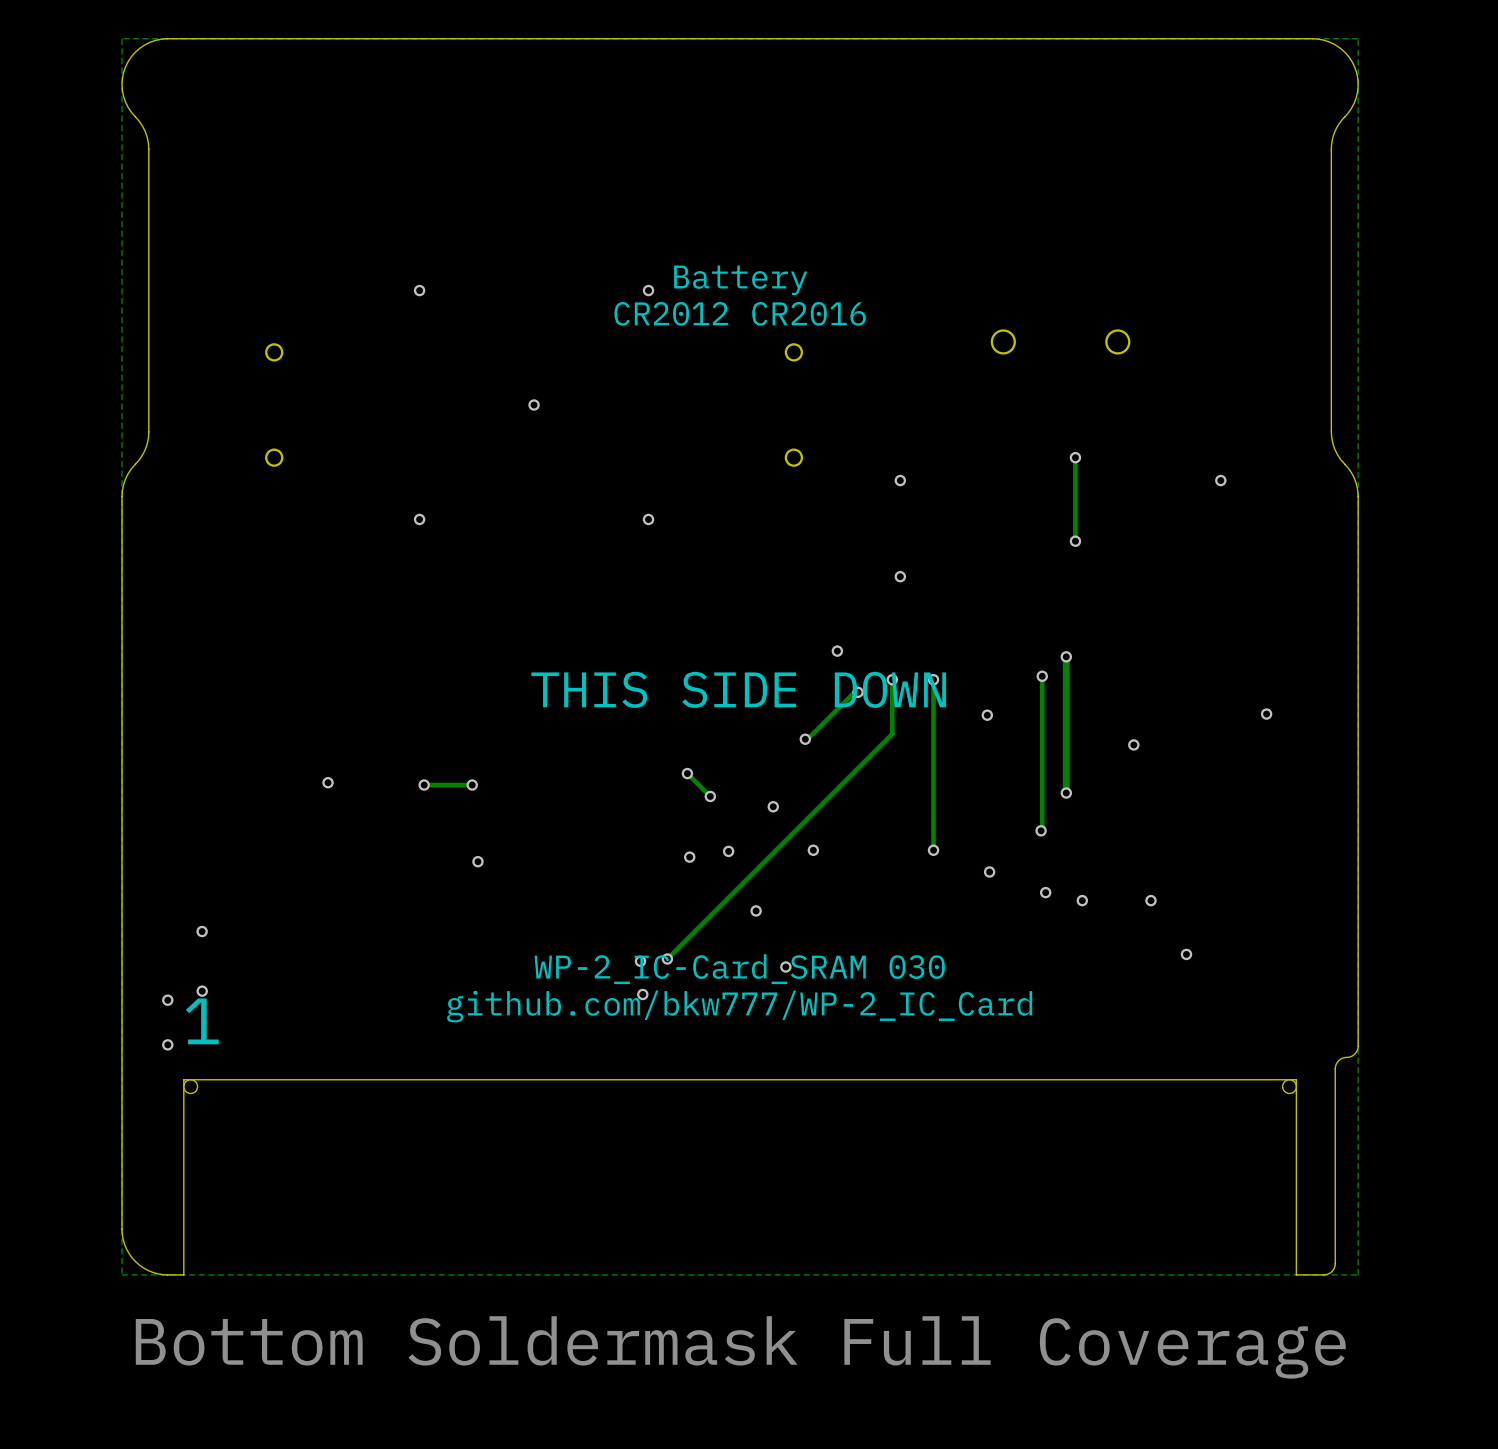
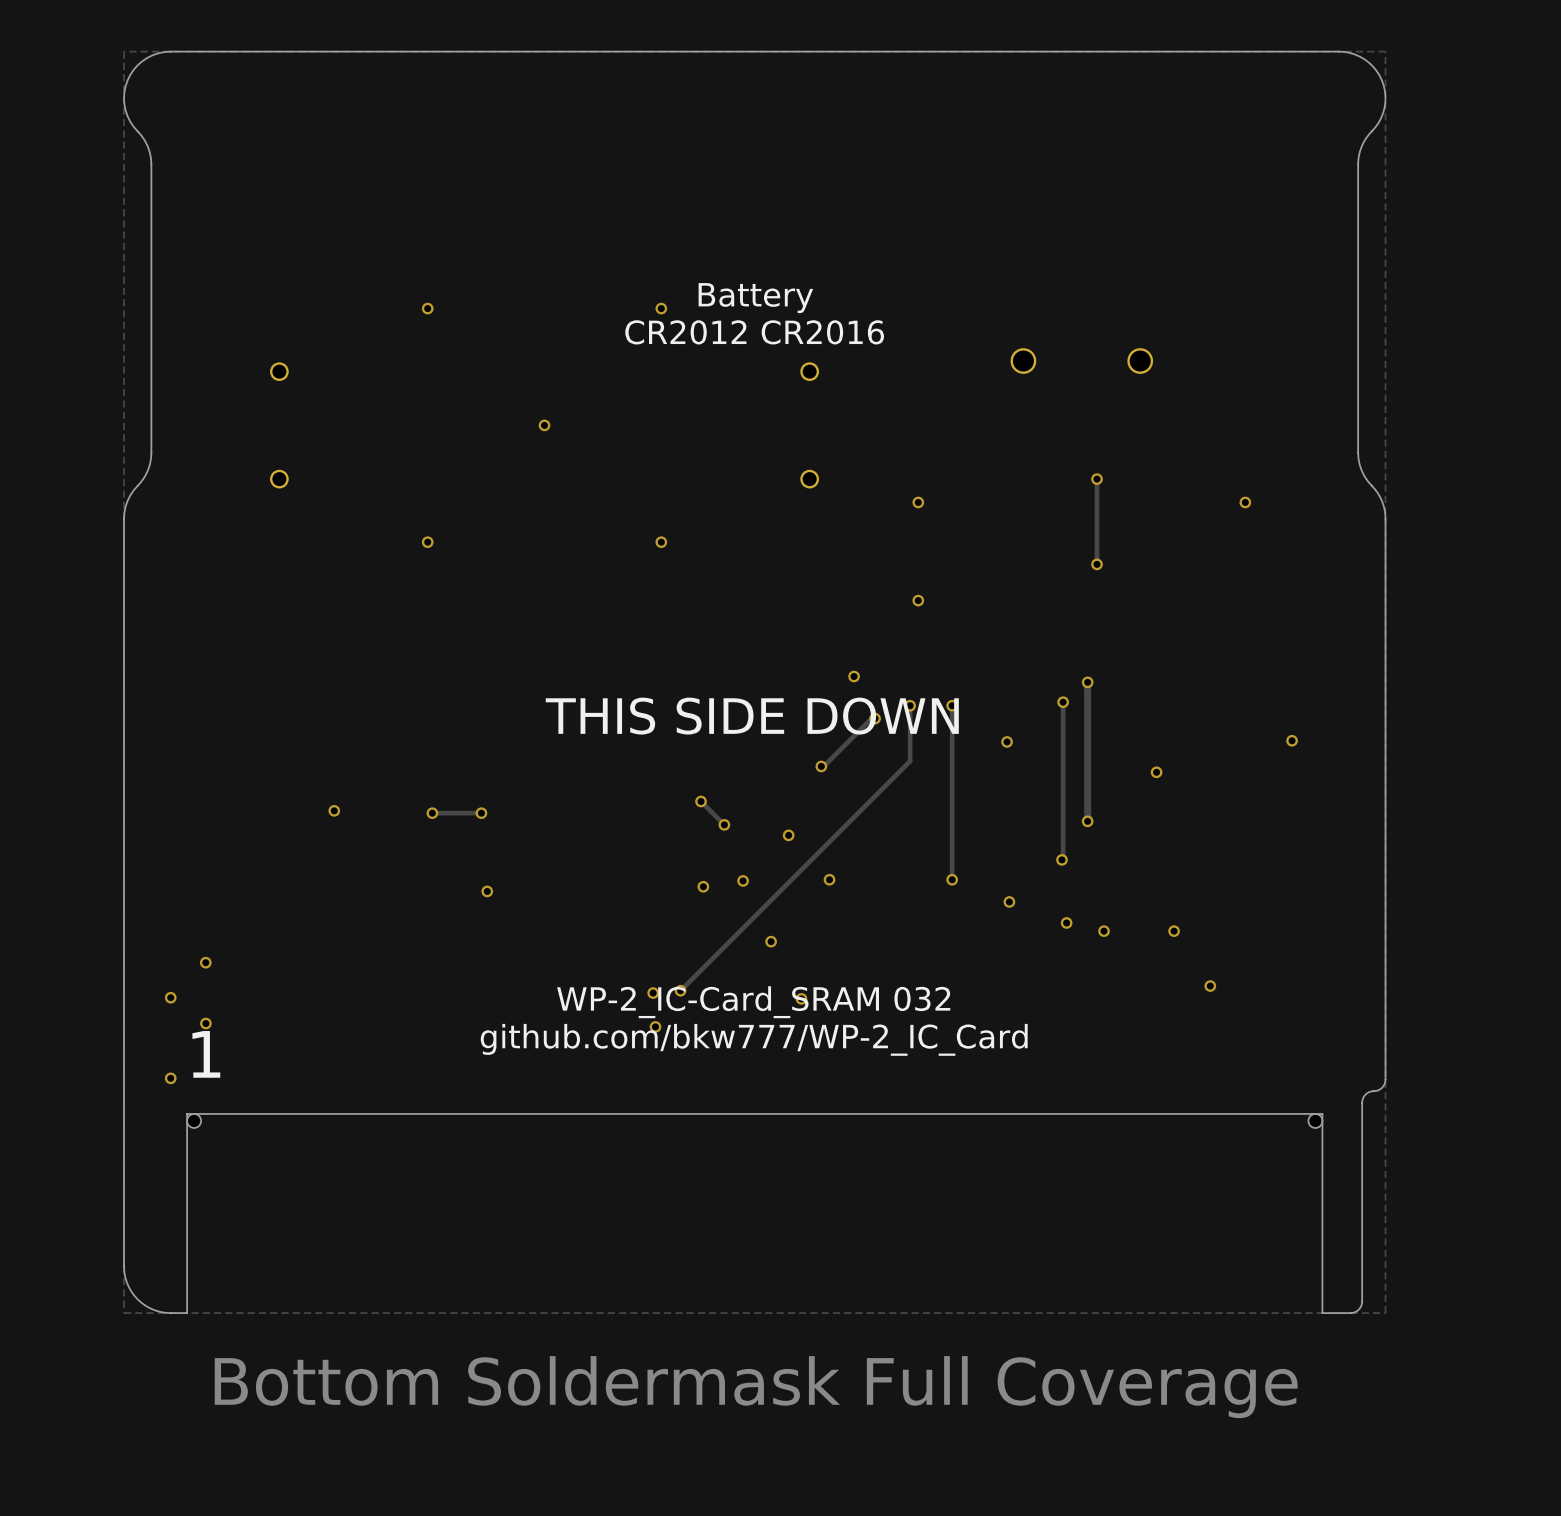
text: WP-2_IC-Card_SRAM 030 (739, 969) -> WP-2_IC-Card_SRAM 032 (753, 1002)
via position: (167, 1000) -> (170, 997)

